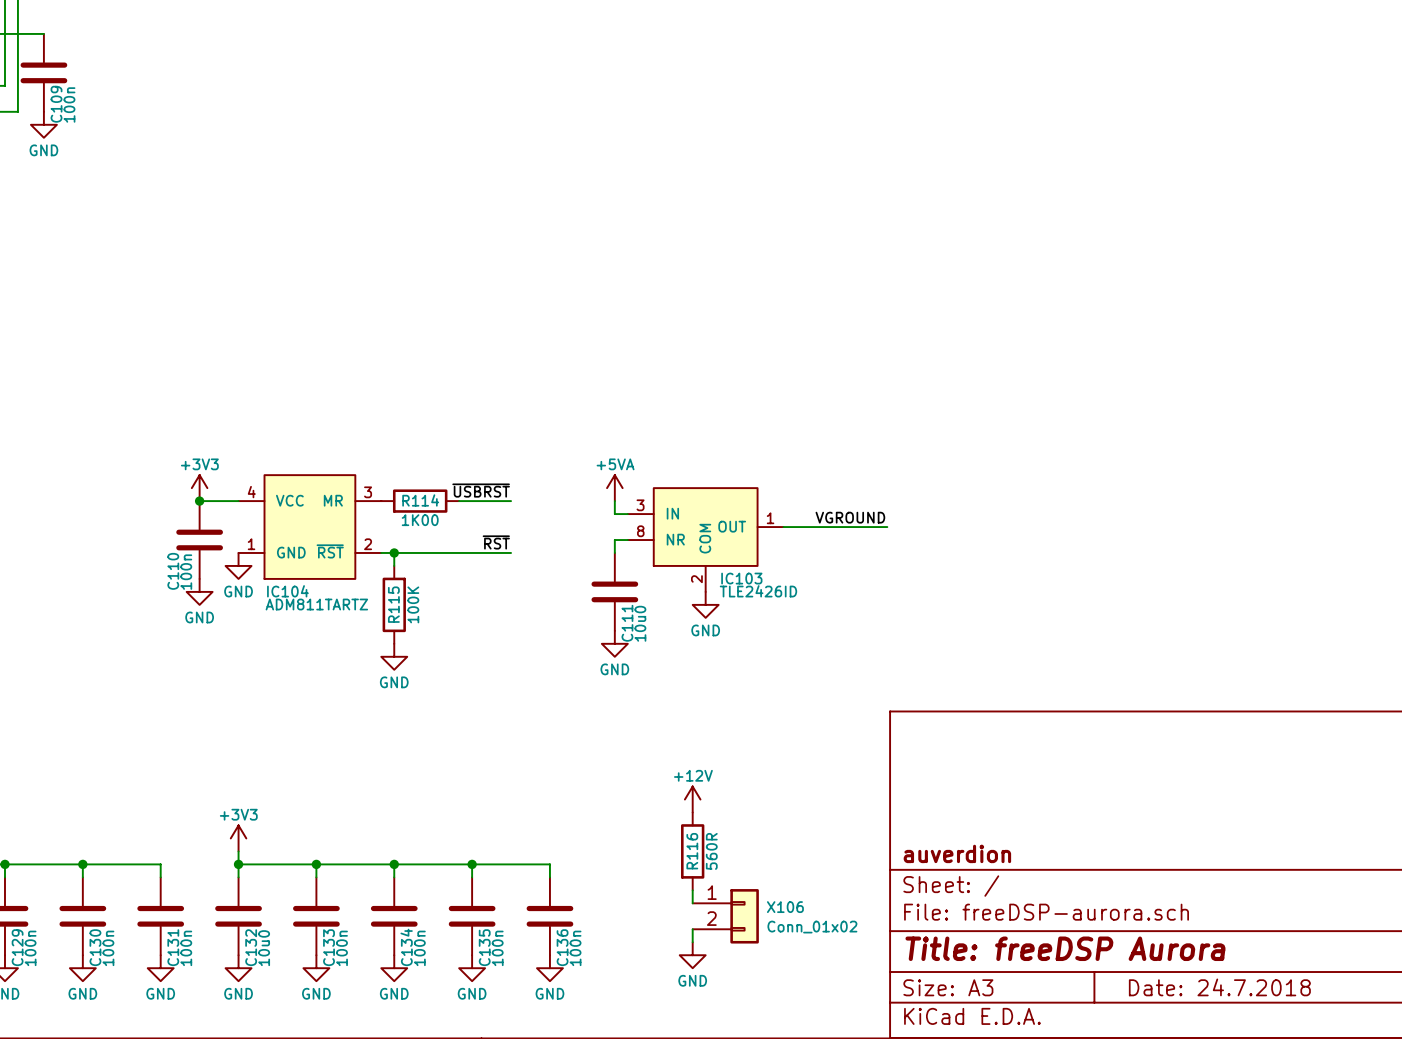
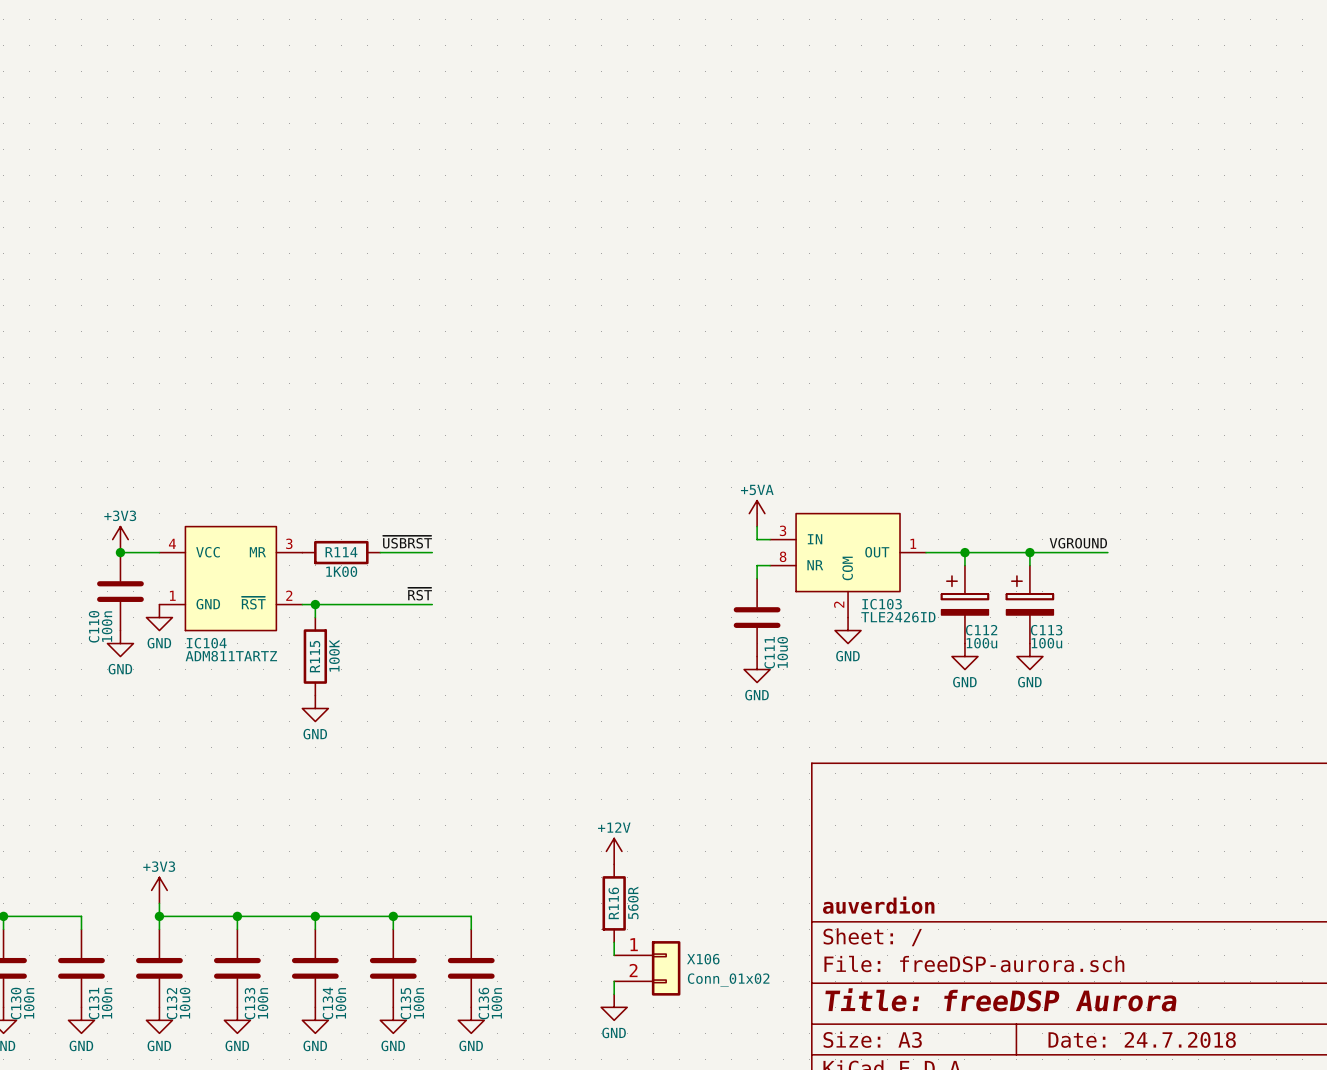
power symbol position: +5VA (614, 488) -> +5VA (757, 513)
label: none -> VGROUND (1078, 543)
wire: (614, 501) (614, 514) (627, 514) -> (757, 526) (757, 539) (770, 539)
wire: none -> (925, 552) (1107, 552)
wire: none -> (964, 552) (964, 565)
junction: none -> (964, 552)
wire: none -> (1029, 552) (1029, 565)
junction: none -> (1029, 552)
label: VGROUND (850, 517) -> none
wire: (783, 527) (887, 527) -> none
wire: (627, 540) (614, 540) (614, 552) -> (770, 565) (757, 565) (757, 578)
IC103 position: (705, 540) -> (848, 565)
C112: none -> (964, 604)
C113: none -> (1029, 604)
power symbol: none -> GND (848, 630)
C111 position: (614, 591) -> (757, 617)
power symbol: GND (705, 604) -> none
power symbol: none -> GND (964, 656)
power symbol: none -> GND (1029, 656)
power symbol: none -> GND (757, 669)
power symbol: GND (614, 643) -> none

